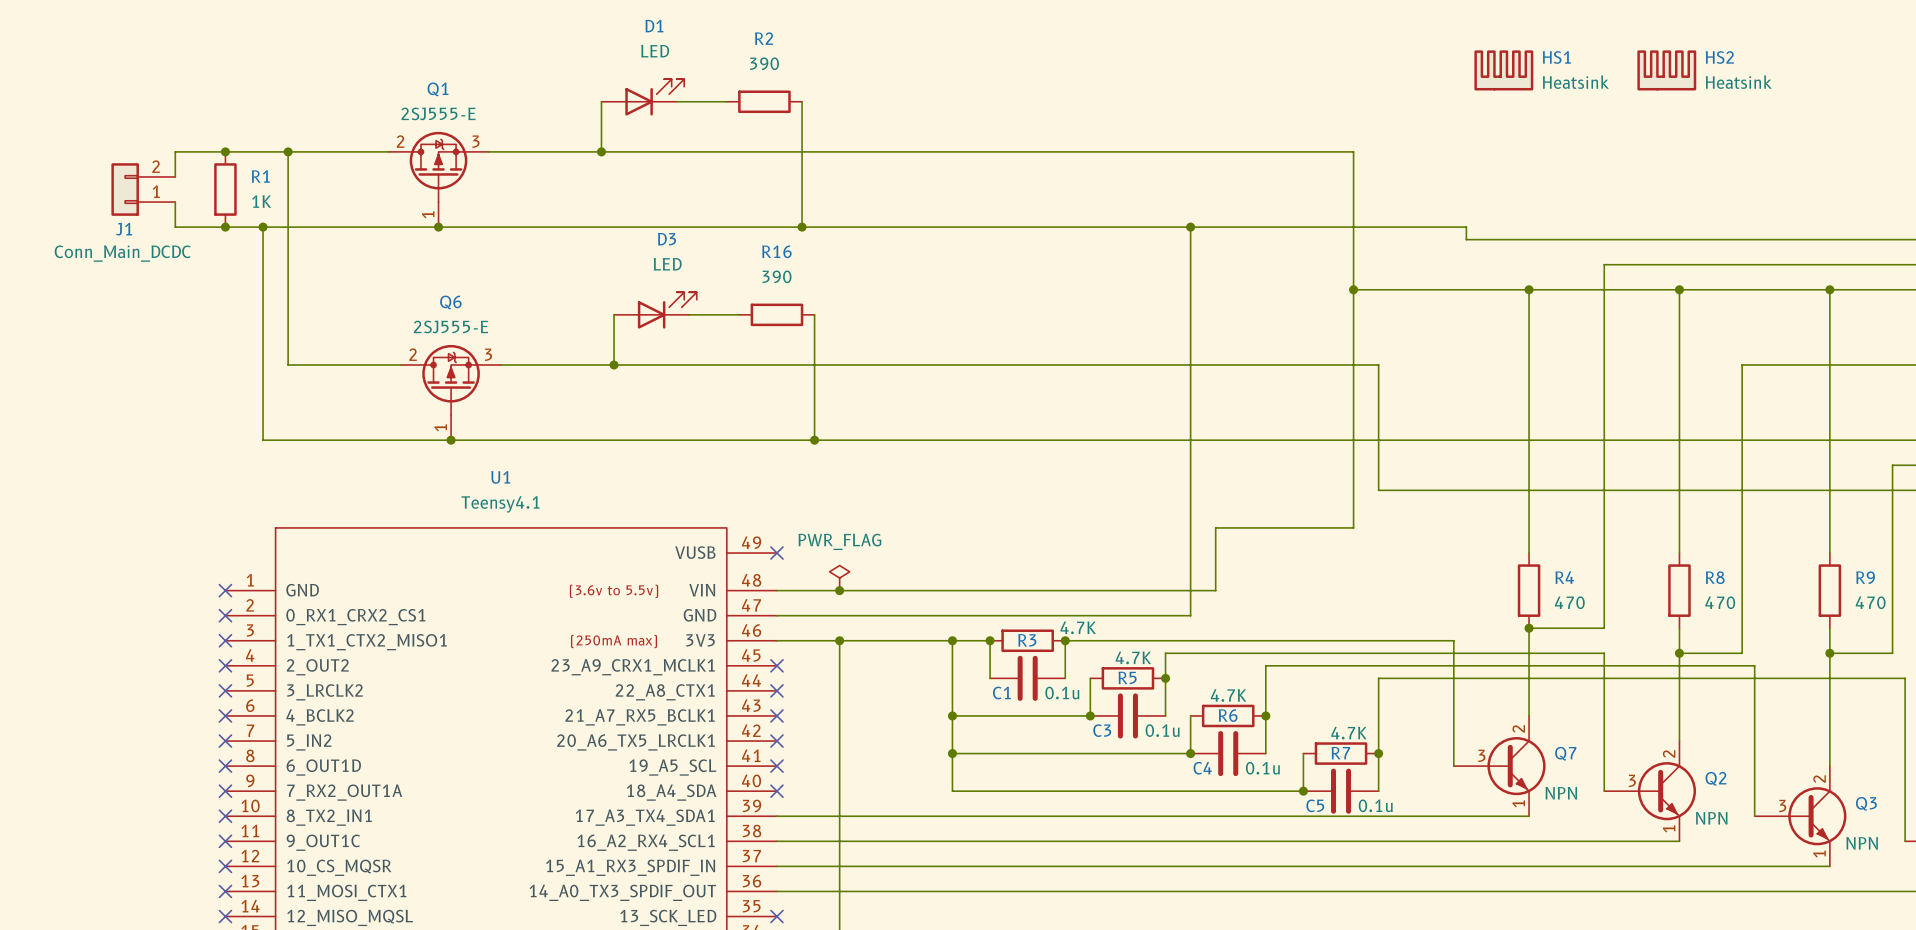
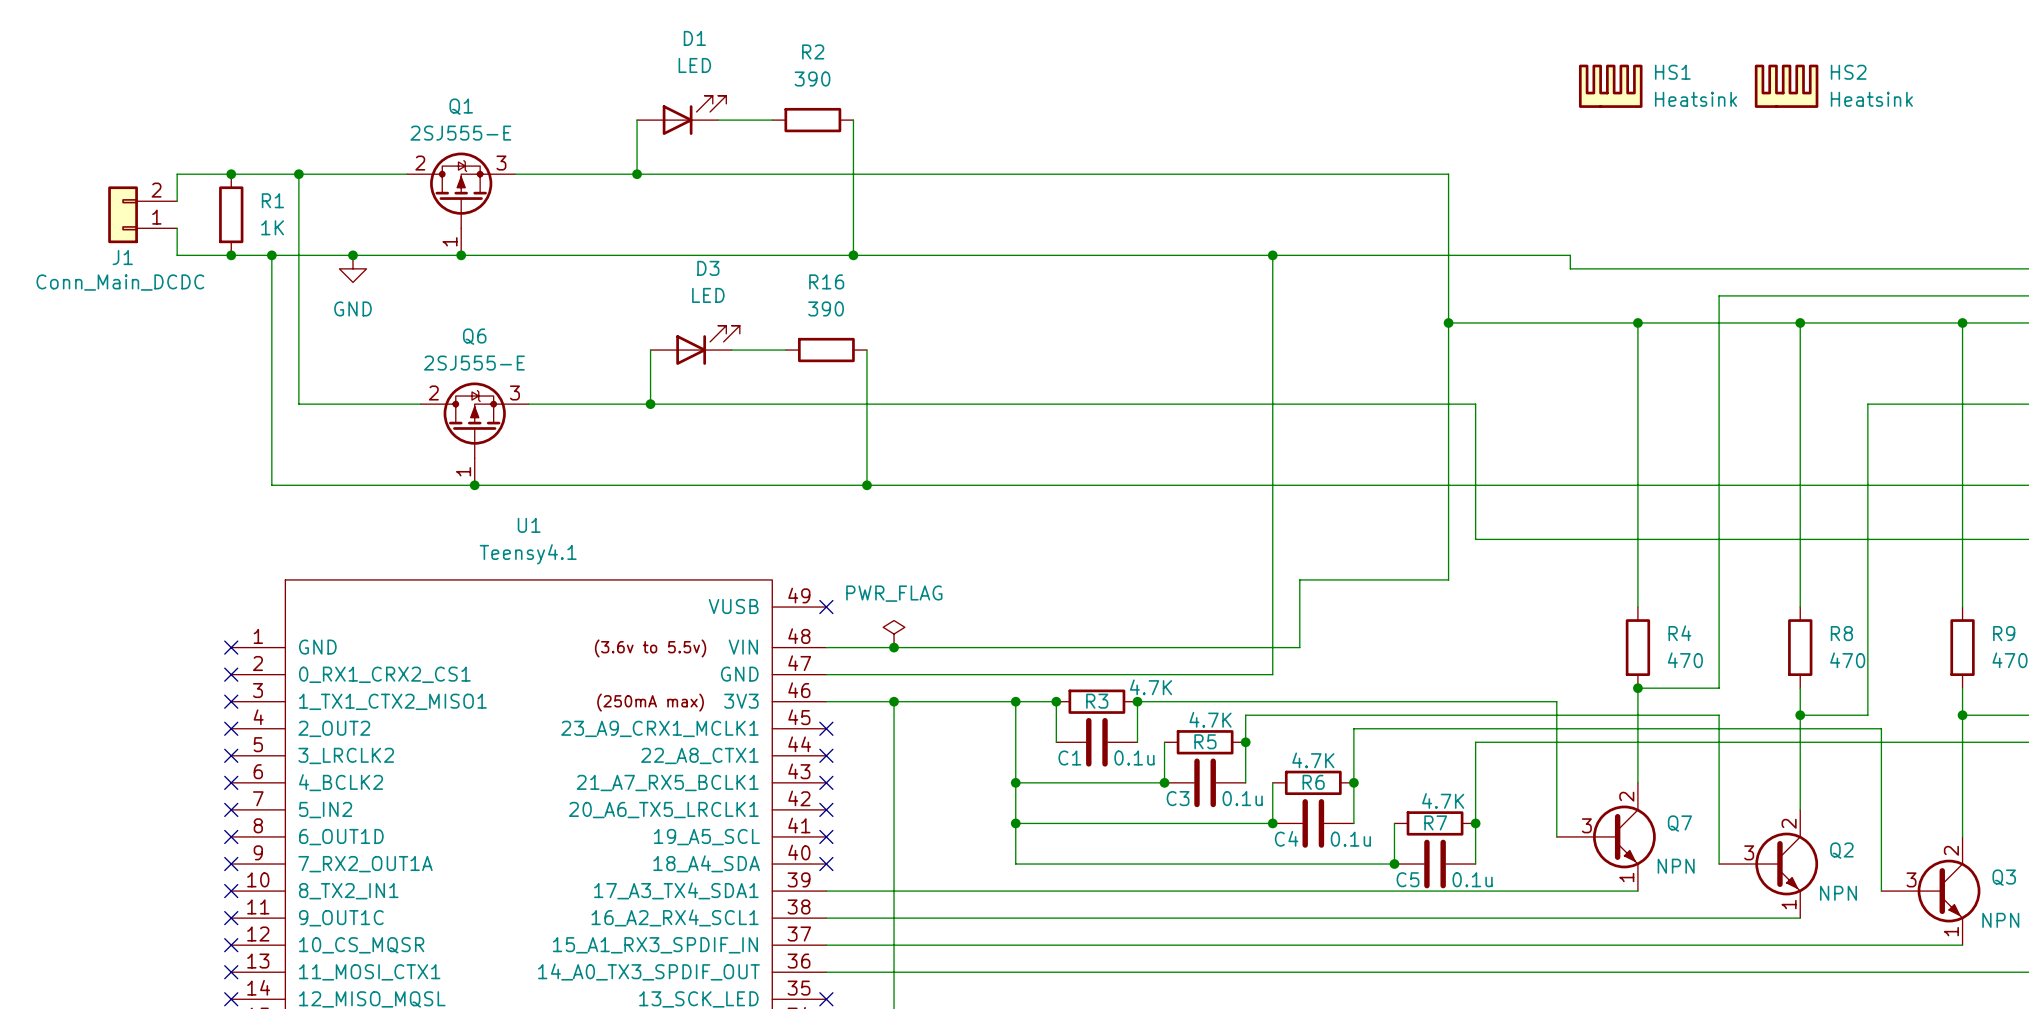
junction: none -> (352, 255)
power symbol: none -> GND (352, 268)

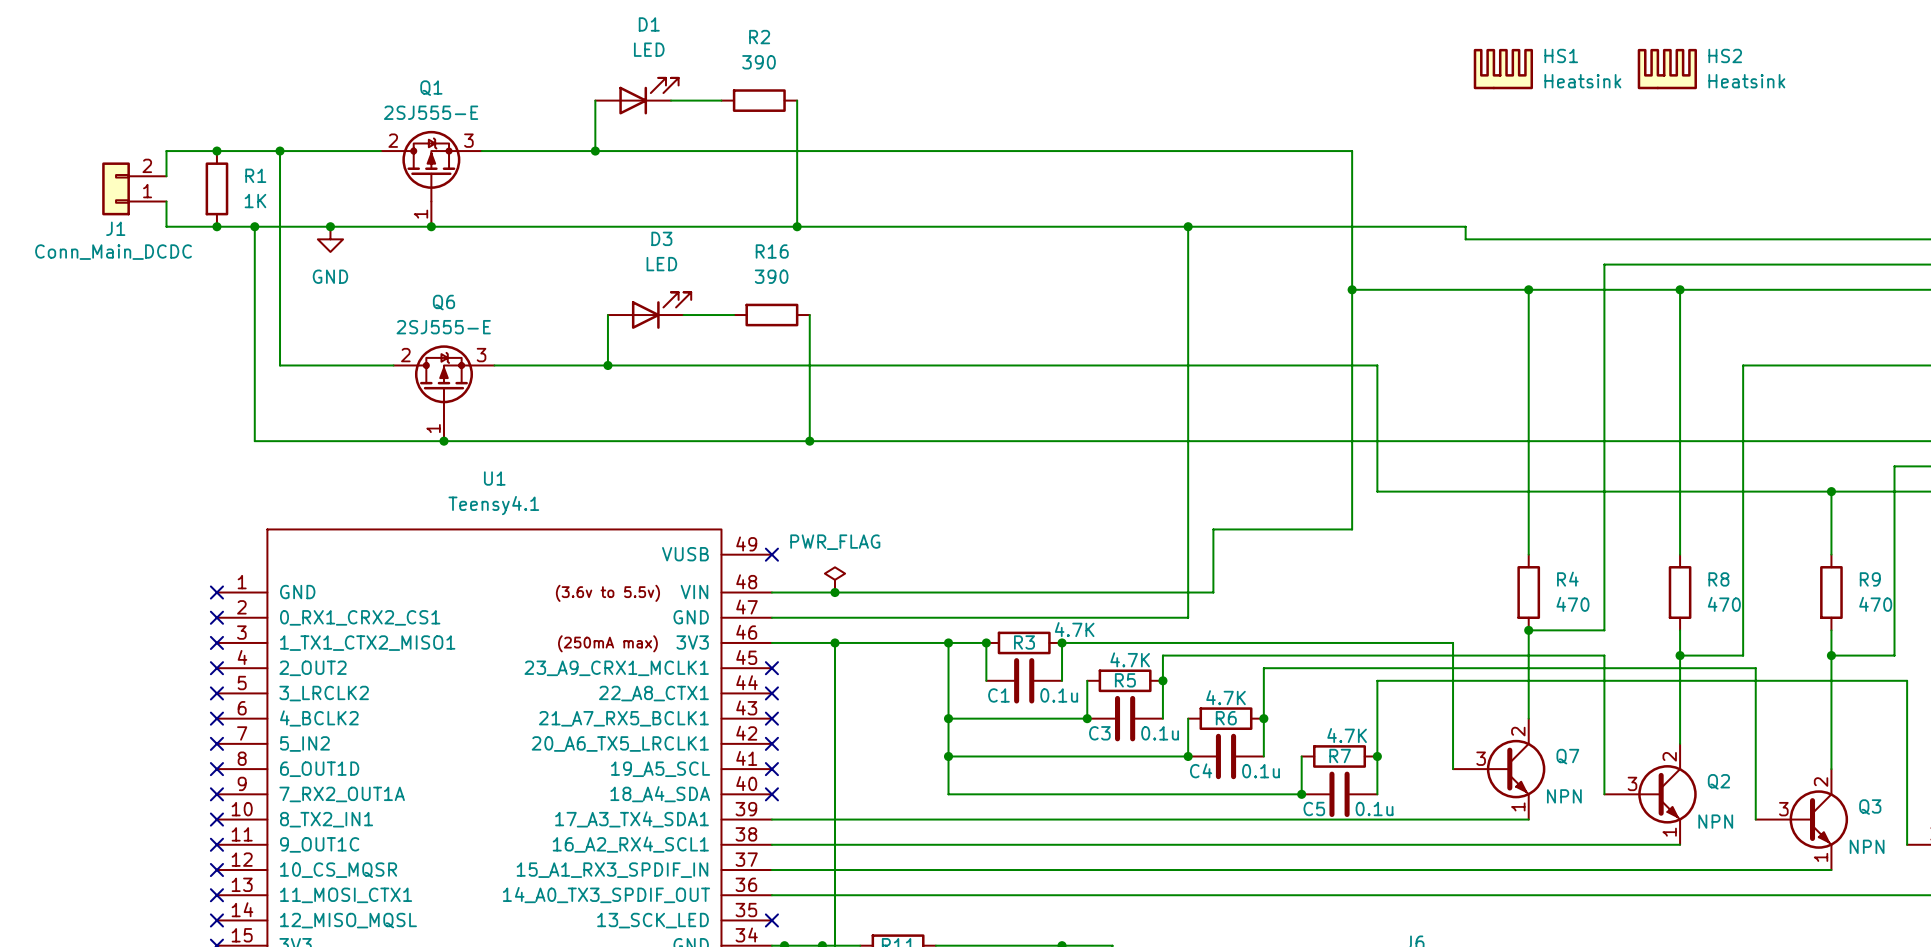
wire: (1962, 322) (1962, 539) -> none
junction: (1962, 322) -> none
junction: none -> (1831, 491)

